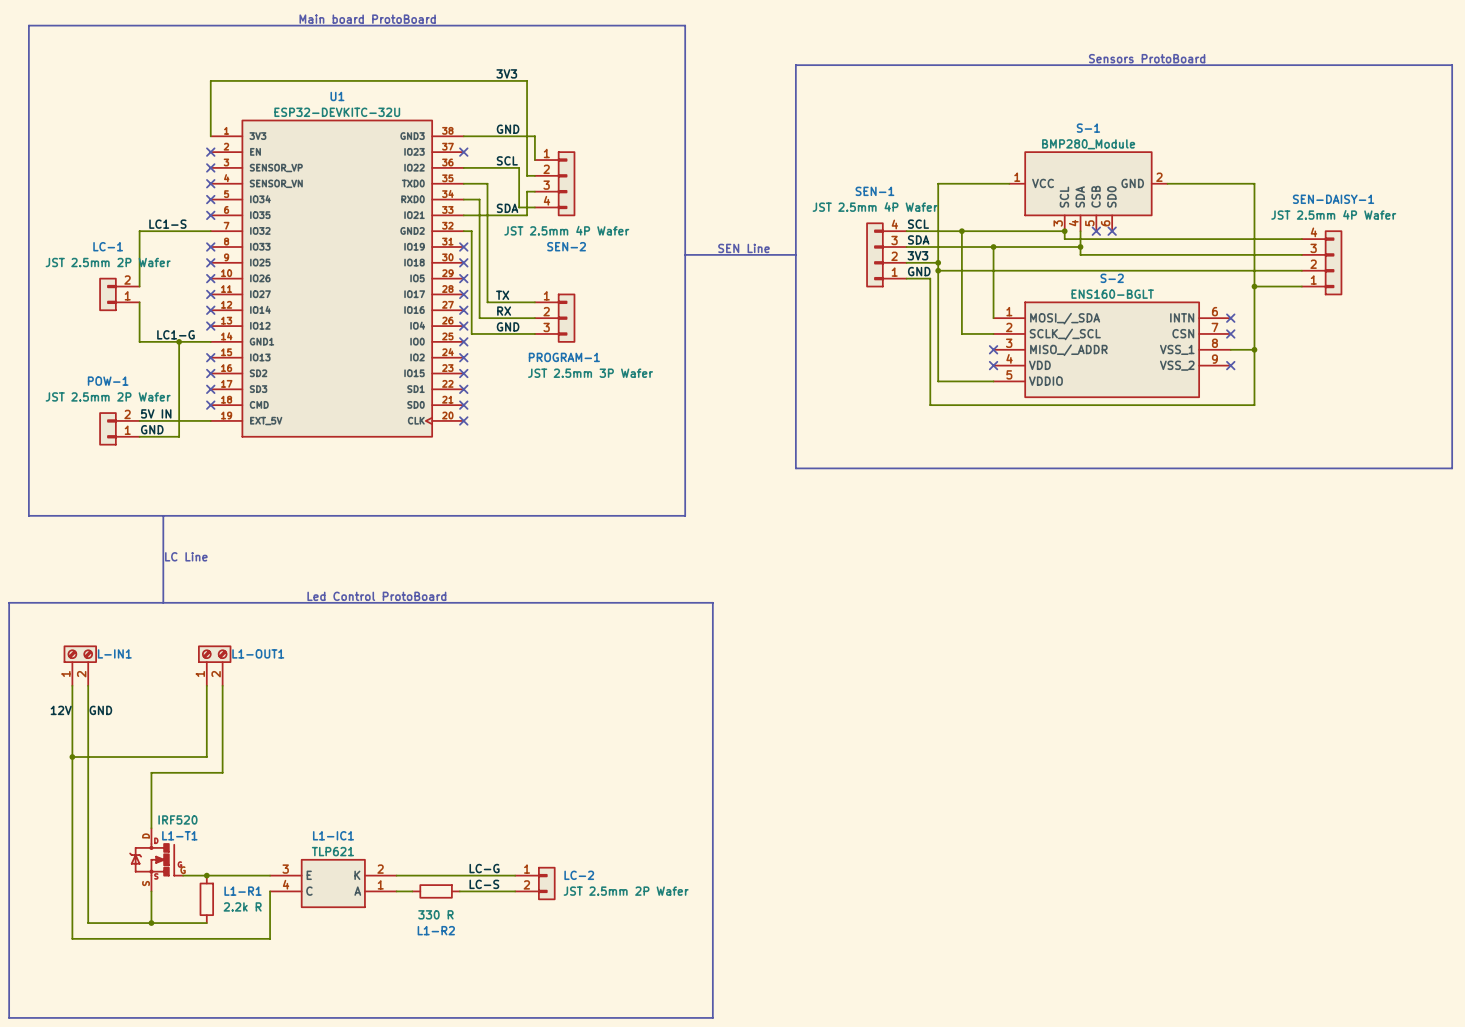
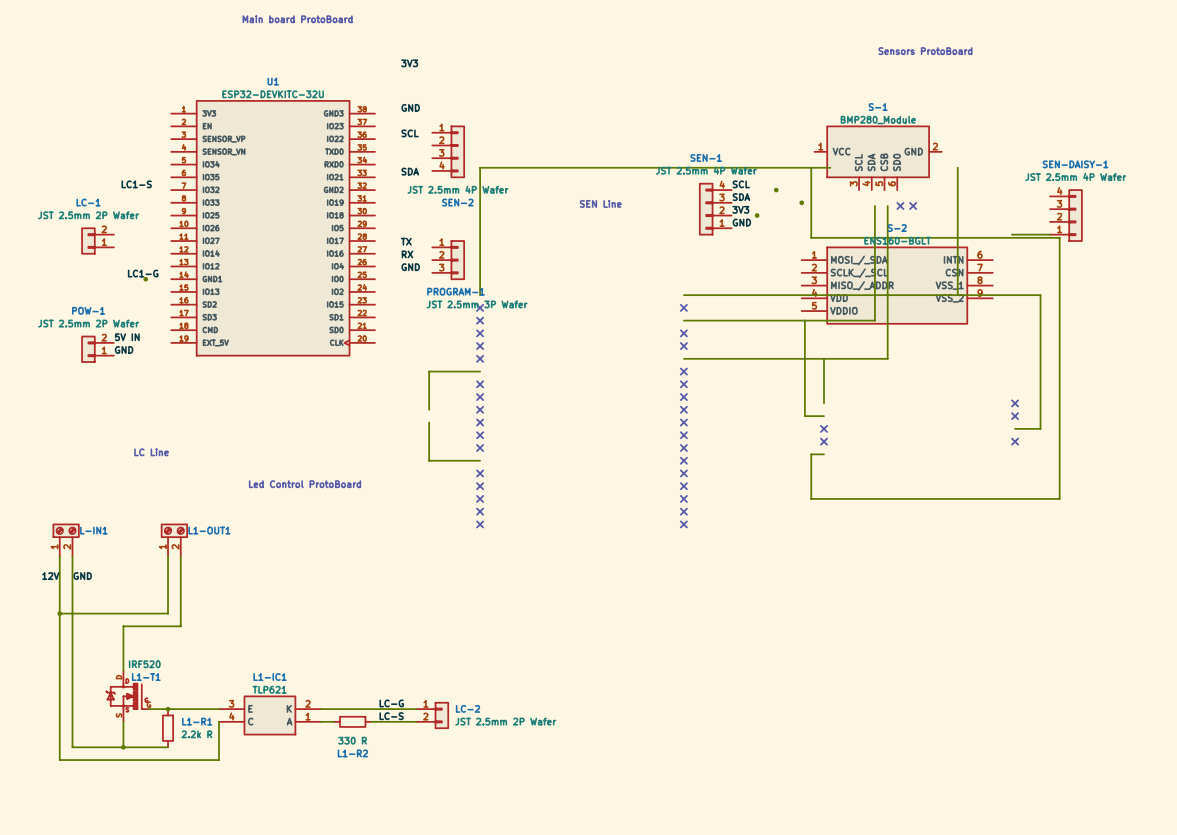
line: (28, 25) (685, 25) (685, 515) (28, 515) (28, 25) -> none
line: (795, 65) (1452, 65) (1452, 468) (795, 468) (795, 65) -> none
wire: (210, 136) (210, 80) (527, 80) (527, 175) (534, 175) -> none
wire: (463, 136) (534, 136) (534, 160) -> none
no-connect mark: (210, 152) -> none
no-connect mark: (463, 152) -> none
no-connect mark: (210, 167) -> none
wire: (463, 167) (519, 167) (519, 207) (534, 207) -> none
no-connect mark: (210, 183) -> none
wire: (463, 183) (487, 183) (487, 302) (534, 302) -> none
wire: (1009, 183) (938, 183) (938, 381) (993, 381) -> none
wire: (1167, 183) (1254, 183) (1254, 405) (930, 405) (930, 278) (906, 278) -> none
wire: (534, 191) (527, 191) (527, 215) (463, 215) -> none
no-connect mark: (210, 199) -> none
wire: (463, 199) (479, 199) (479, 318) (534, 318) -> none
wire: none -> (811, 167) (811, 237) (1059, 237) (1059, 498) (811, 498) (811, 454) (824, 454)
wire: none -> (830, 167) (480, 167) (480, 295)
wire: none -> (957, 167) (957, 295)
no-connect mark: (210, 215) -> none
wire: (210, 231) (139, 231) (139, 286) -> none
wire: (463, 231) (471, 231) (471, 333) (534, 333) -> none
wire: (906, 231) (1064, 231) (1064, 239) (1301, 239) -> none
wire: (961, 231) (961, 333) (993, 333) -> none
junction: (1064, 231) -> none
wire: (1080, 231) (1080, 254) (1301, 254) -> none
no-connect mark: (1096, 231) -> none
no-connect mark: (1112, 231) -> none
no-connect mark: (210, 247) -> none
no-connect mark: (463, 247) -> none
wire: (906, 247) (1080, 247) -> none
wire: (993, 247) (993, 318) -> none
junction: (1080, 247) -> none
wire: none -> (874, 205) (874, 320) (683, 320)
wire: none -> (887, 205) (887, 358) (683, 358)
no-connect mark: none -> (900, 205)
no-connect mark: none -> (913, 205)
line: (685, 254) (795, 254) -> none
no-connect mark: (210, 262) -> none
no-connect mark: (463, 262) -> none
wire: (906, 262) (938, 262) -> none
wire: (938, 270) (1301, 270) -> none
junction: (938, 270) -> none
no-connect mark: (210, 278) -> none
no-connect mark: (463, 278) -> none
junction: (1254, 286) -> none
no-connect mark: (210, 294) -> none
no-connect mark: (463, 294) -> none
wire: (139, 302) (139, 341) (210, 341) -> none
no-connect mark: (210, 310) -> none
no-connect mark: (463, 310) -> none
no-connect mark: (1230, 318) -> none
no-connect mark: (210, 326) -> none
no-connect mark: (463, 326) -> none
no-connect mark: (1230, 333) -> none
wire: (179, 341) (179, 436) (139, 436) -> none
no-connect mark: (463, 341) -> none
no-connect mark: (993, 349) -> none
wire: (1230, 349) (1254, 349) -> none
junction: (1254, 349) -> none
no-connect mark: (210, 357) -> none
no-connect mark: (463, 357) -> none
wire: none -> (683, 295) (1040, 295) (1040, 428) (1015, 428)
no-connect mark: (993, 365) -> none
no-connect mark: (1230, 365) -> none
no-connect mark: (210, 373) -> none
no-connect mark: (463, 373) -> none
no-connect mark: none -> (480, 307)
no-connect mark: none -> (683, 307)
no-connect mark: (210, 389) -> none
no-connect mark: (463, 389) -> none
no-connect mark: none -> (480, 320)
wire: none -> (804, 320) (804, 416) (824, 416)
no-connect mark: (210, 405) -> none
no-connect mark: (463, 405) -> none
no-connect mark: none -> (480, 333)
no-connect mark: none -> (683, 333)
wire: (139, 420) (210, 420) -> none
no-connect mark: (463, 420) -> none
no-connect mark: none -> (480, 346)
no-connect mark: none -> (683, 346)
no-connect mark: none -> (480, 358)
wire: none -> (824, 358) (824, 403)
wire: none -> (480, 371) (429, 371) (429, 409)
no-connect mark: none -> (683, 371)
no-connect mark: none -> (480, 384)
no-connect mark: none -> (683, 384)
no-connect mark: none -> (480, 397)
no-connect mark: none -> (683, 397)
no-connect mark: none -> (1015, 403)
no-connect mark: none -> (480, 409)
no-connect mark: none -> (683, 409)
no-connect mark: none -> (1015, 416)
line: (163, 515) (163, 602) -> none
wire: none -> (429, 422) (429, 460) (480, 460)
no-connect mark: none -> (480, 422)
no-connect mark: none -> (683, 422)
no-connect mark: none -> (824, 428)
no-connect mark: none -> (480, 435)
no-connect mark: none -> (683, 435)
no-connect mark: none -> (824, 441)
no-connect mark: none -> (1015, 441)
no-connect mark: none -> (480, 447)
no-connect mark: none -> (683, 447)
no-connect mark: none -> (683, 460)
no-connect mark: none -> (480, 473)
no-connect mark: none -> (683, 473)
no-connect mark: none -> (480, 486)
no-connect mark: none -> (683, 486)
line: (9, 602) (712, 602) (712, 1017) (9, 1017) (9, 602) -> none
no-connect mark: none -> (480, 498)
no-connect mark: none -> (683, 498)
no-connect mark: none -> (480, 511)
no-connect mark: none -> (683, 511)
no-connect mark: none -> (480, 524)
no-connect mark: none -> (683, 524)

